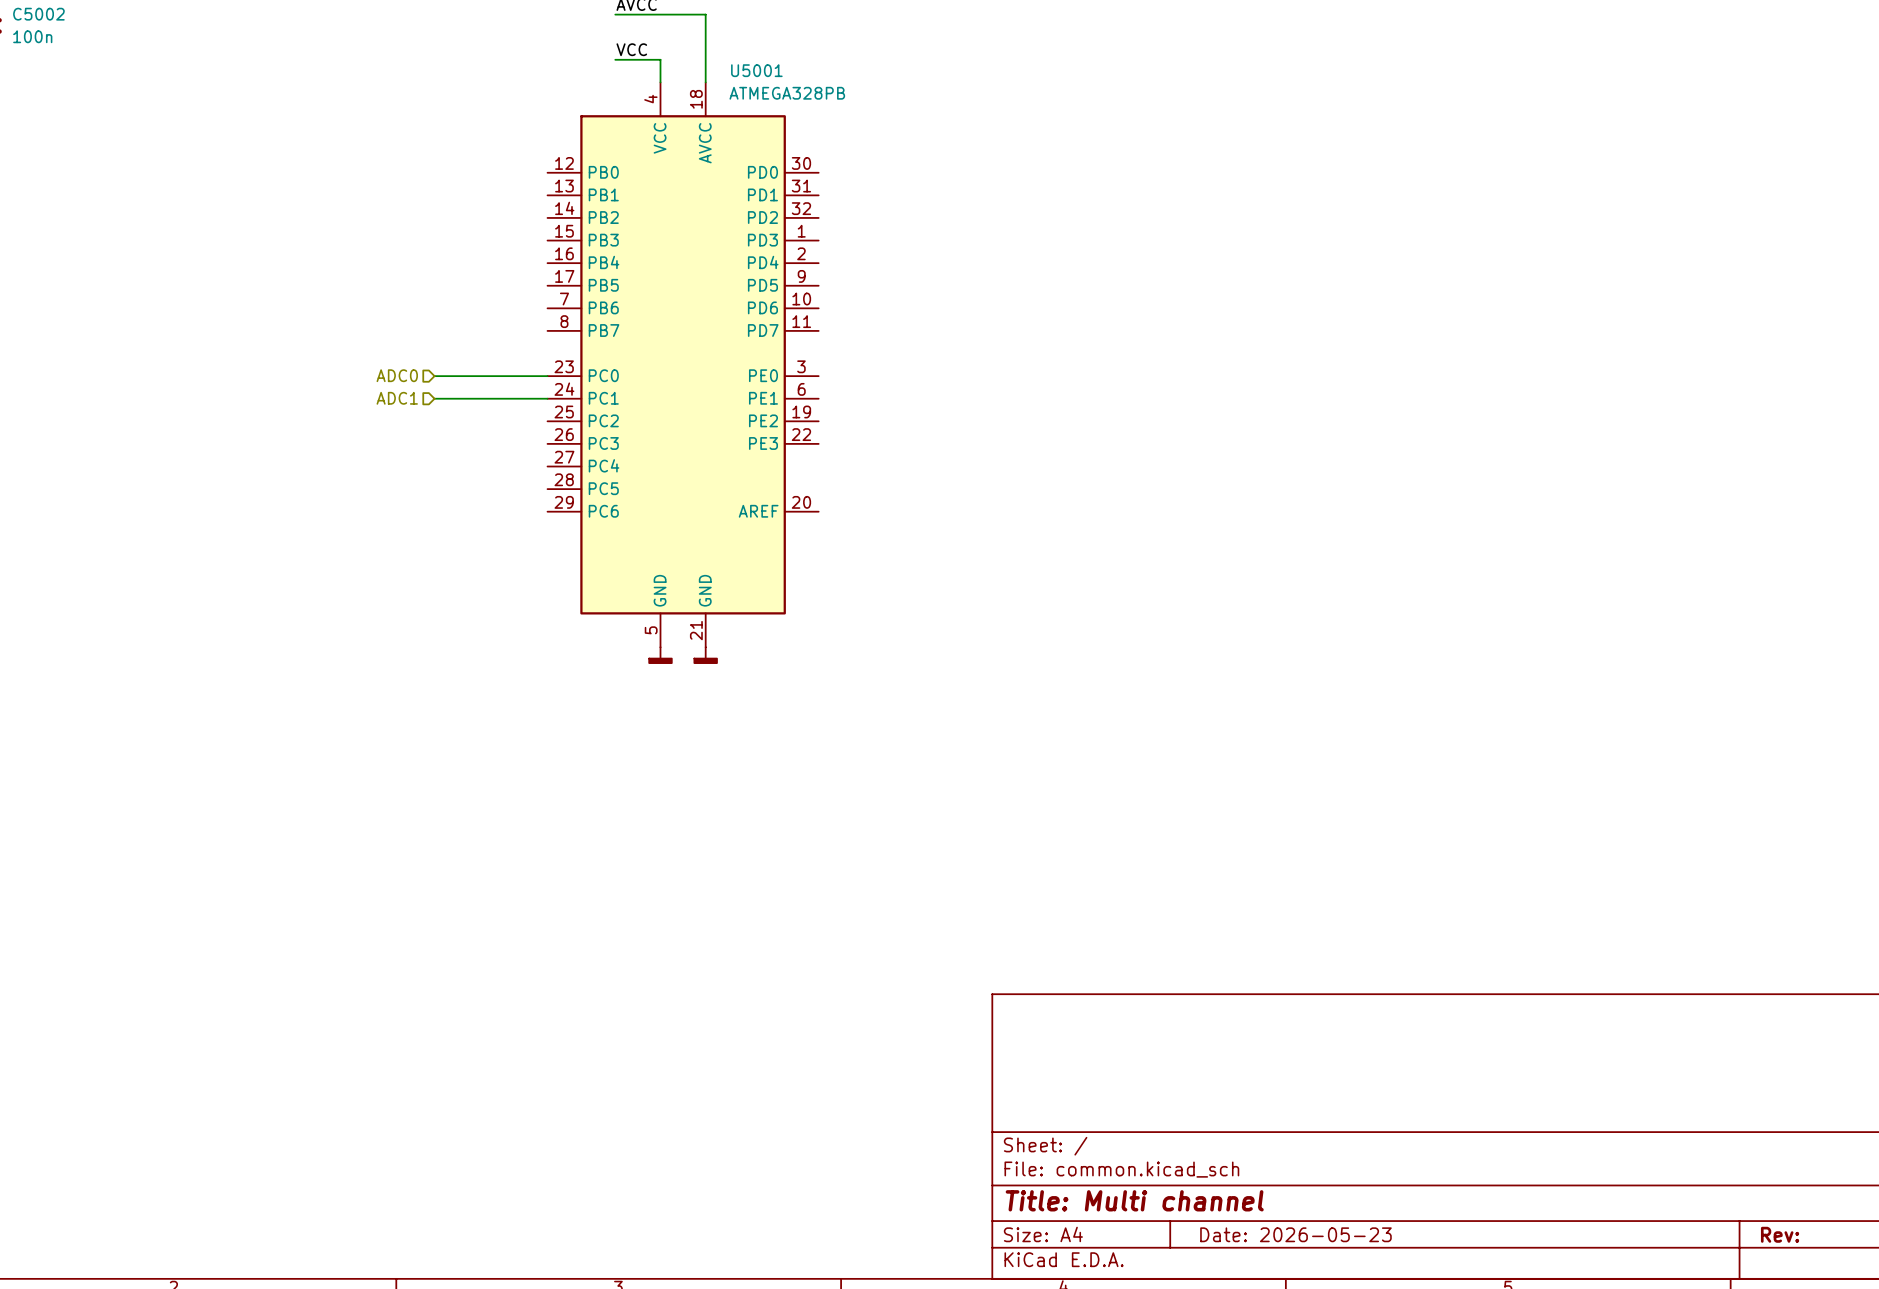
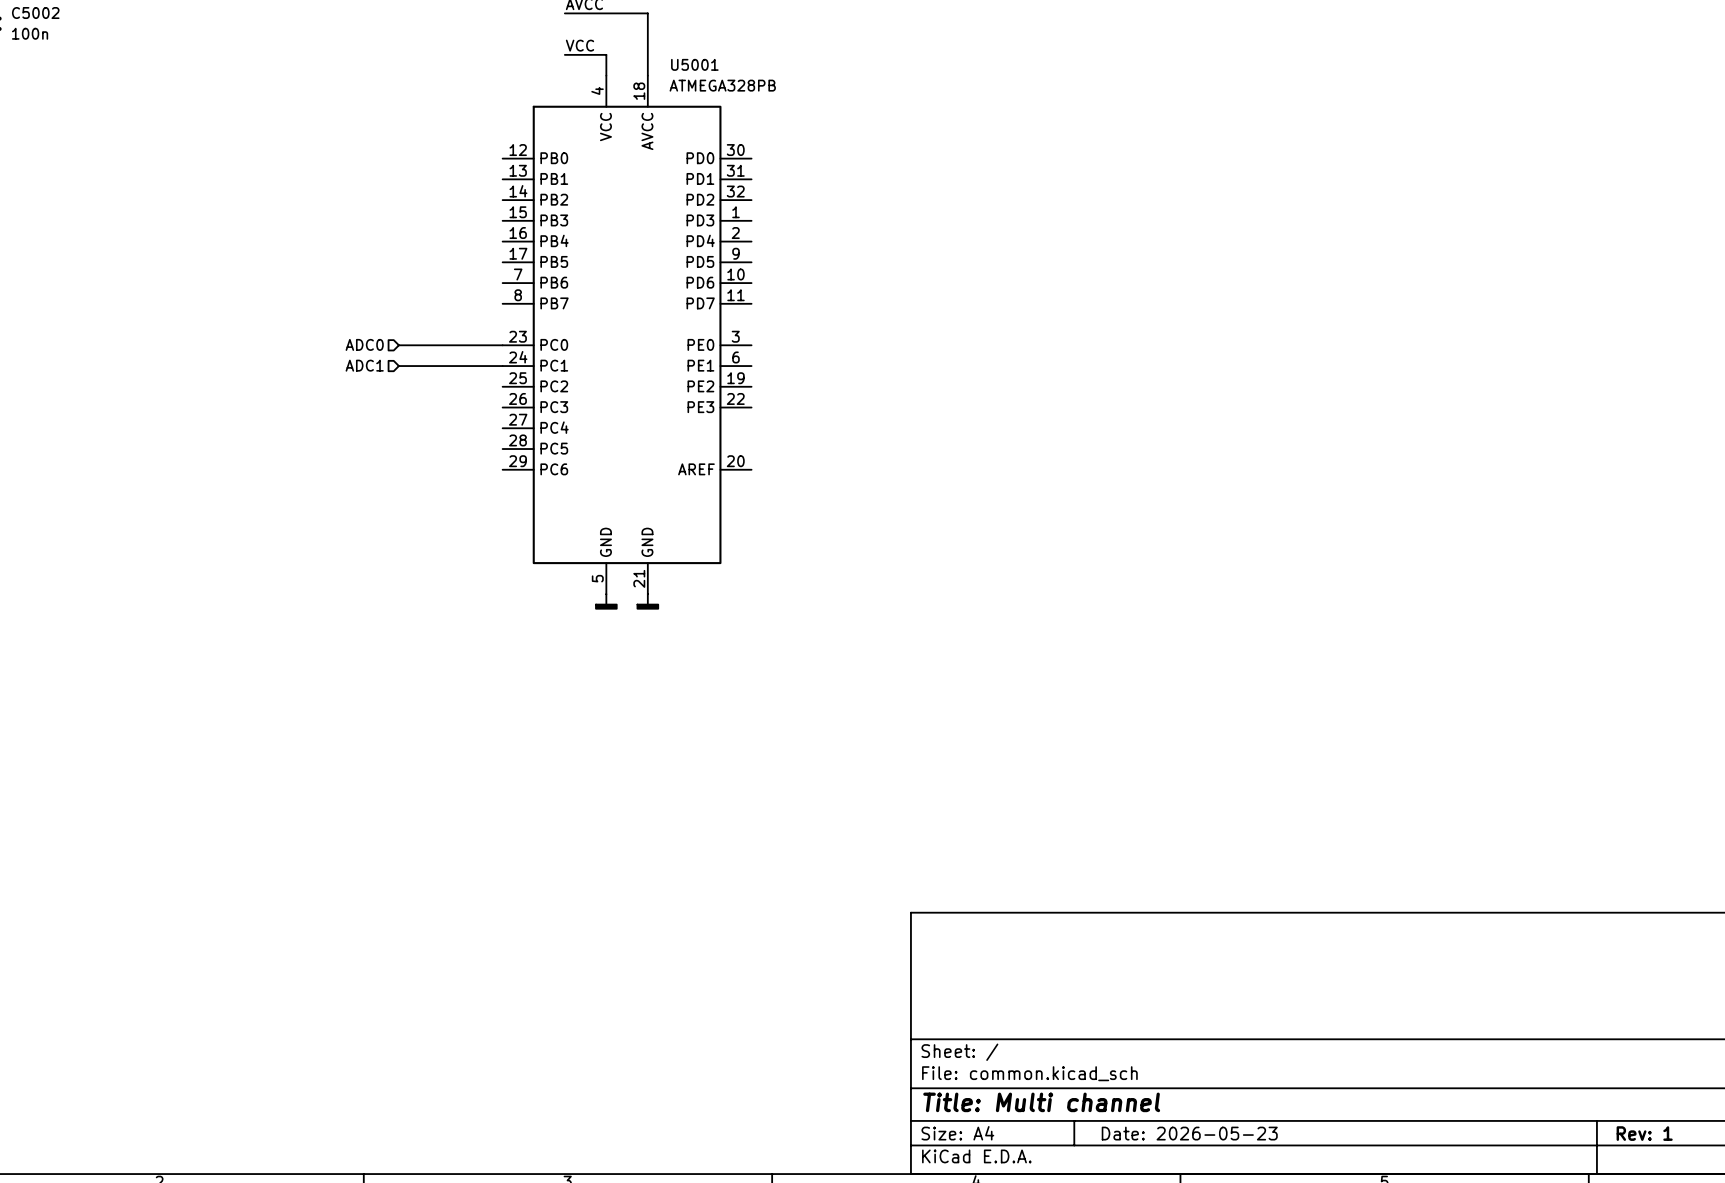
title block: Rev: (1780, 1234) -> Rev: 1 (1644, 1133)

